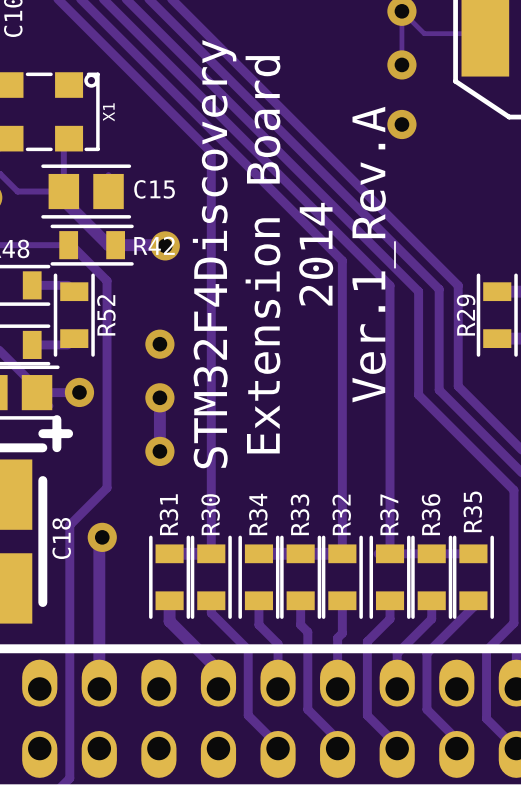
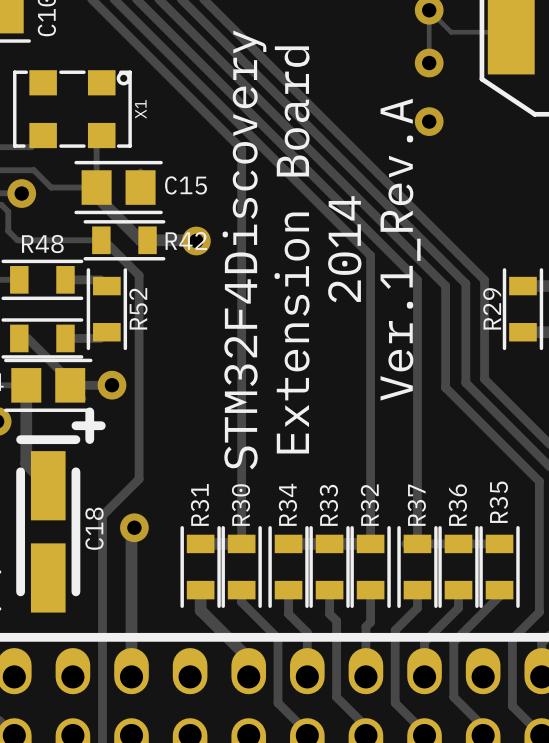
via: (159, 344) -> none
track: (159, 397) (159, 451) -> none
via: (159, 397) -> none
via: (159, 451) -> none

